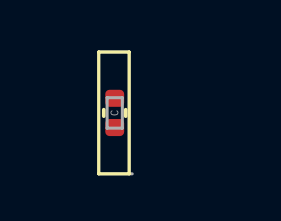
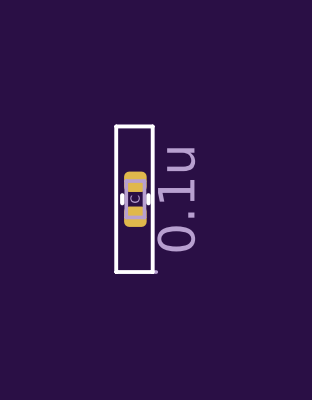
C value: none -> 0.1u (176, 199)

